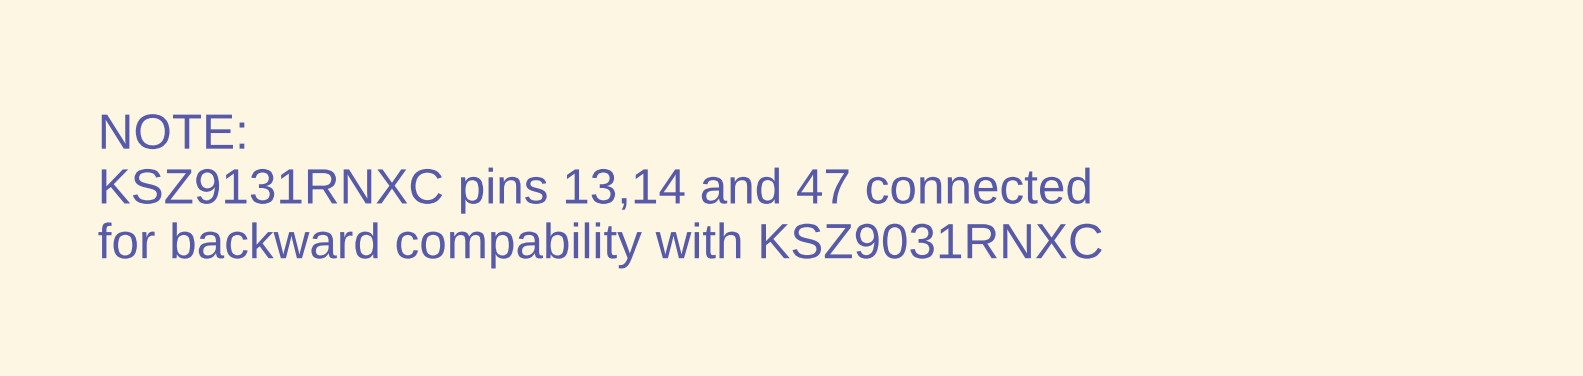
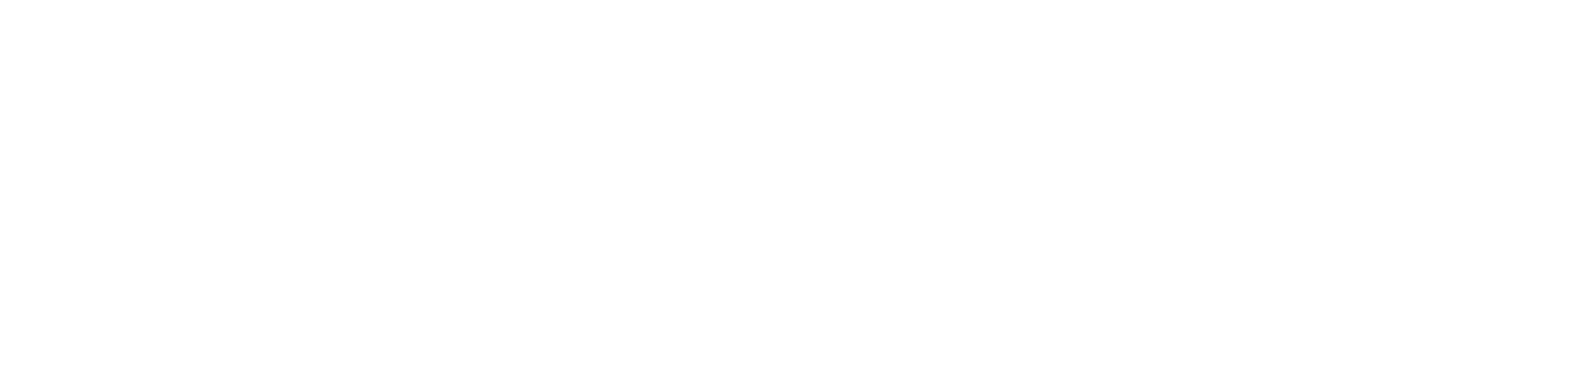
text: NOTE: (173, 131) -> none
text: KSZ9131RNXC pins 13,14 and 47 connected (595, 190) -> none
text: for backward compability with KSZ9031RNXC (600, 245) -> none

